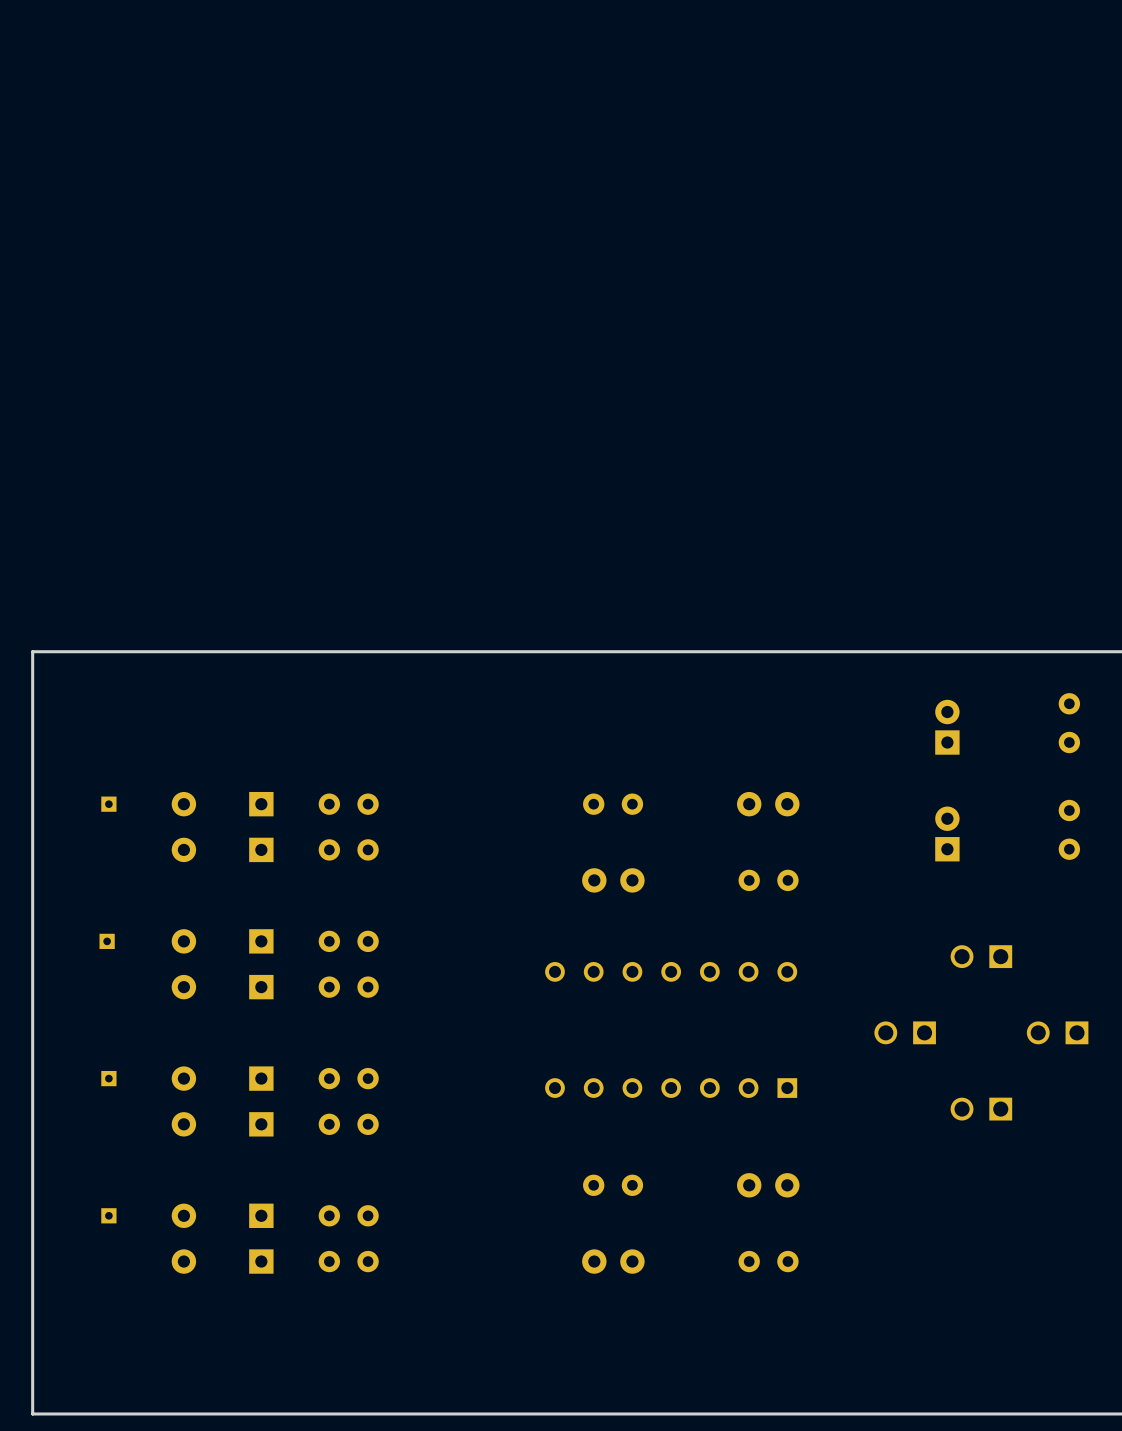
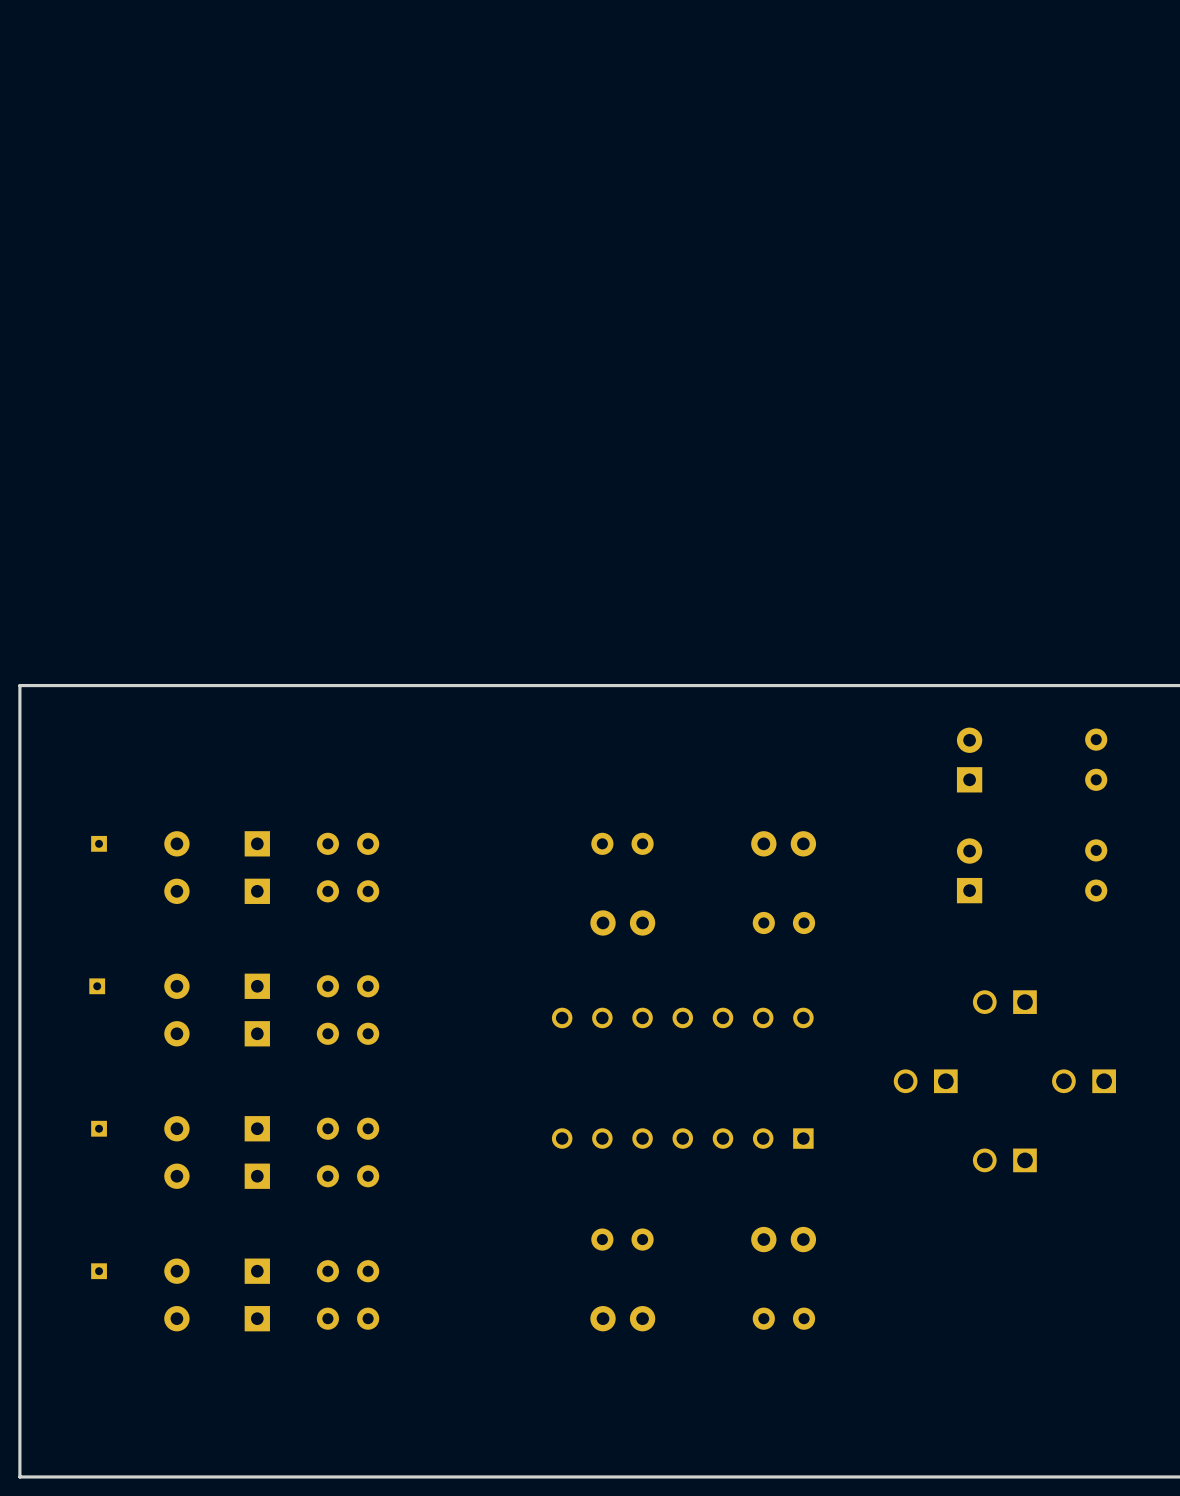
part footprint: [935, 699, 960, 755] -> [956, 727, 983, 793]
part footprint: [935, 806, 960, 862] -> [956, 838, 983, 904]

